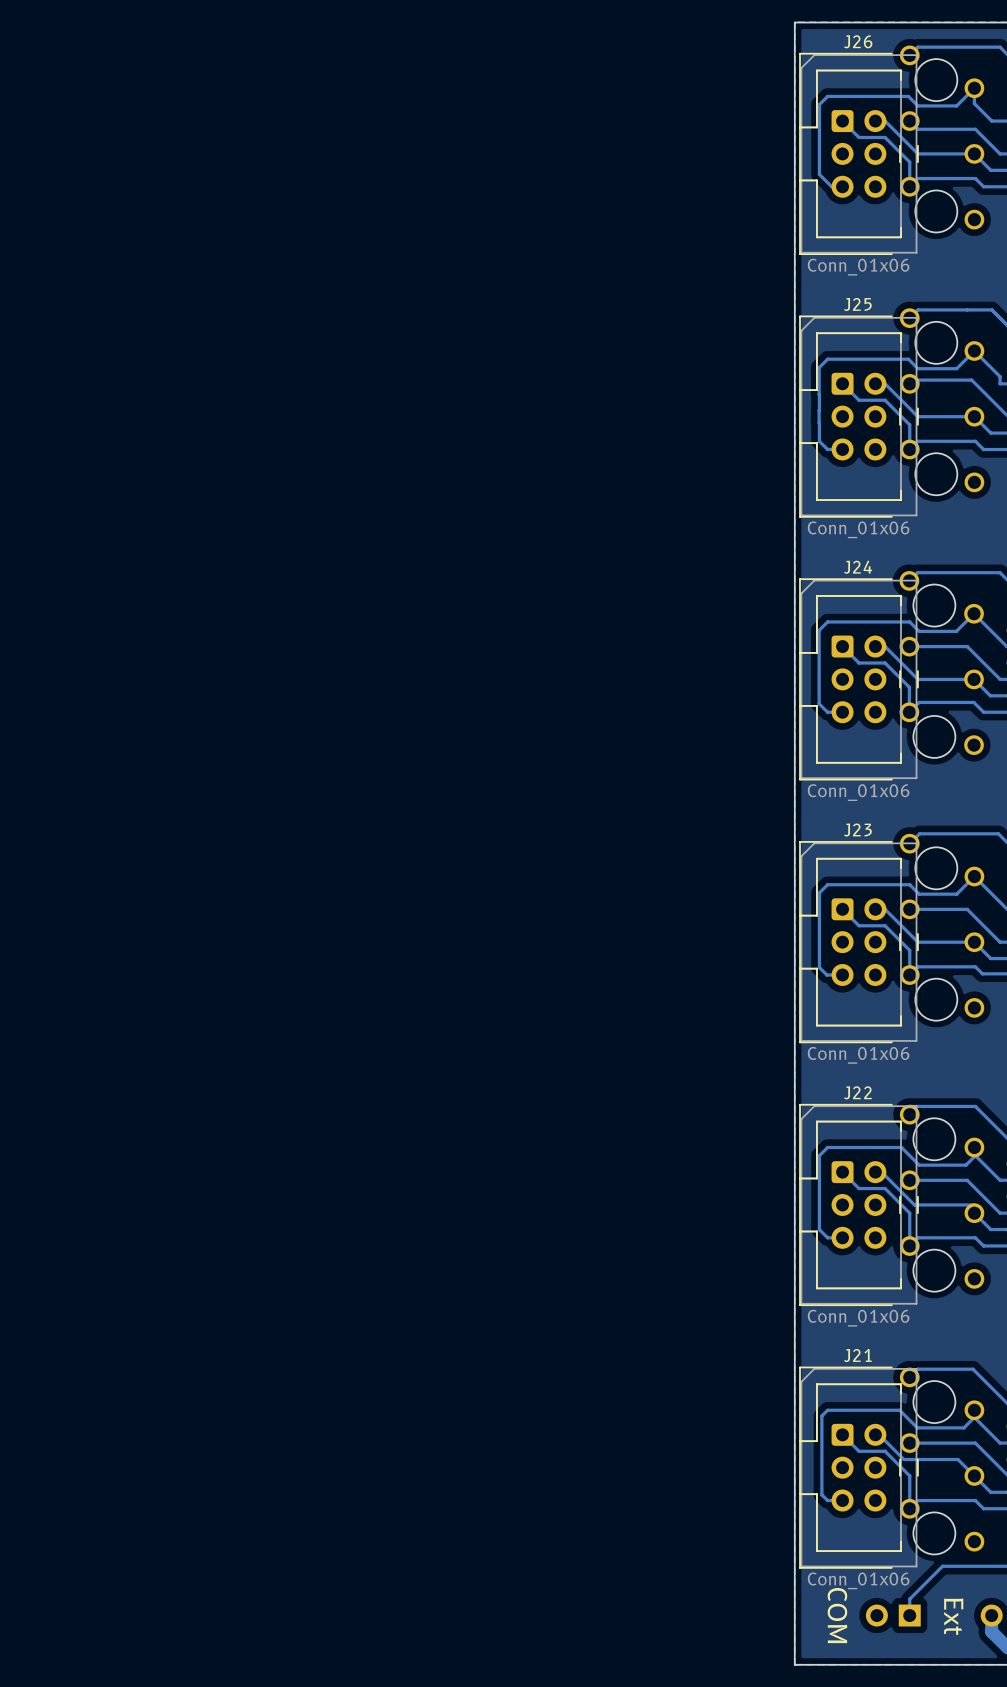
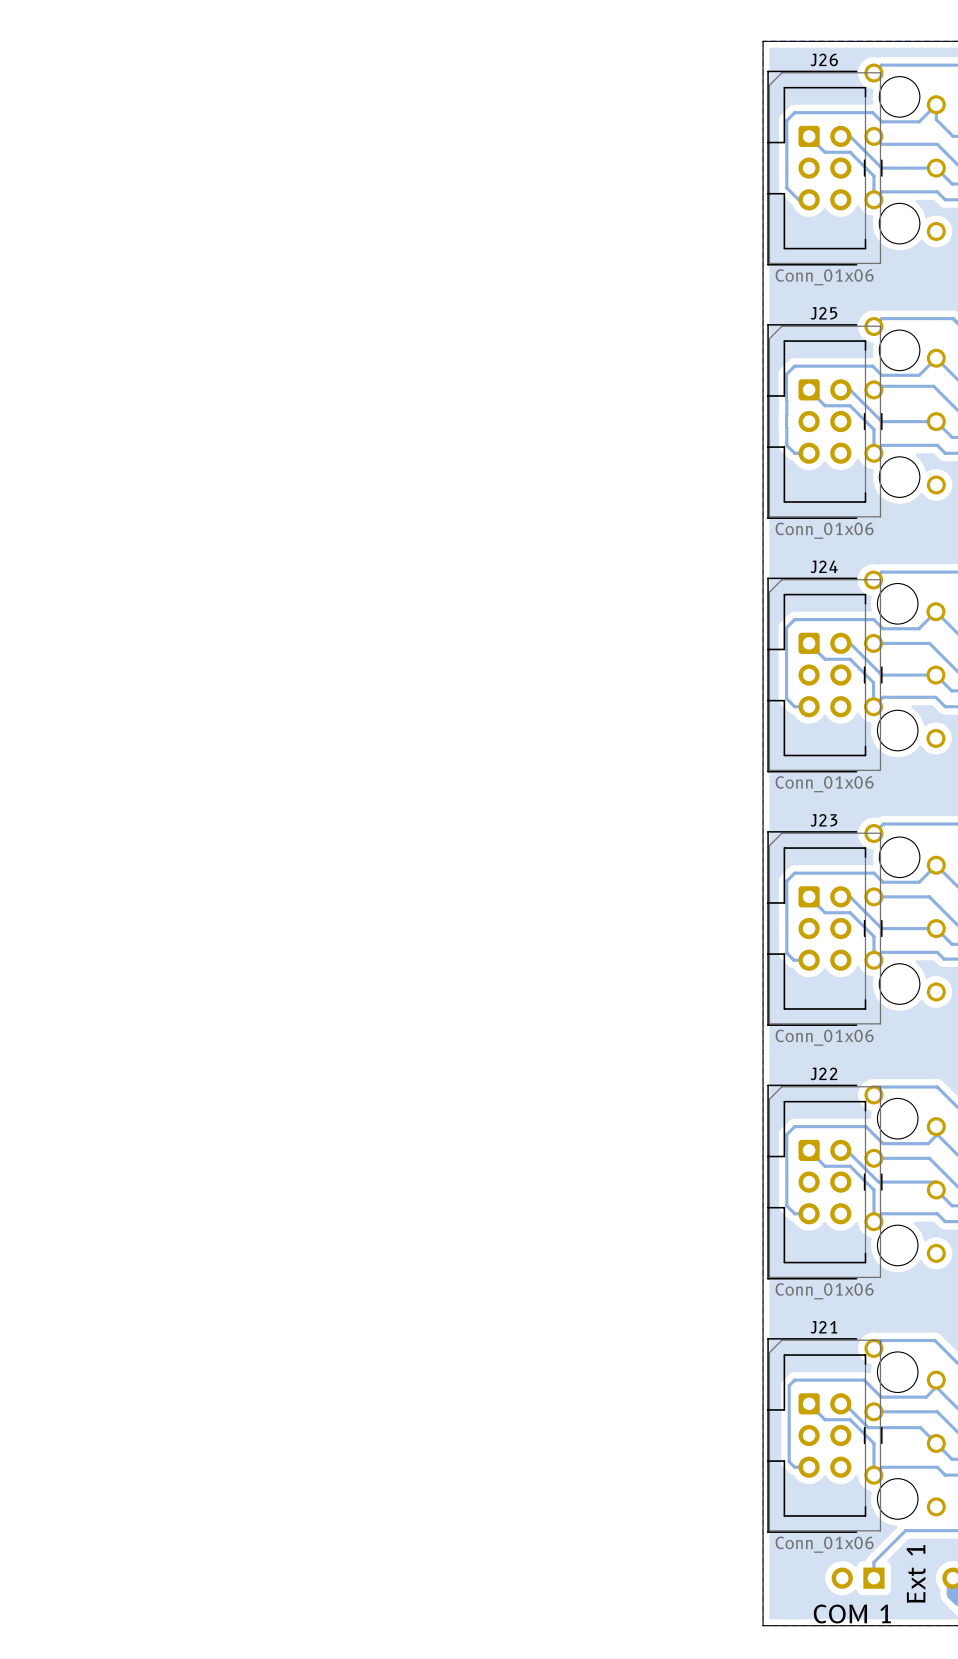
text: COM (837, 1615) -> COM 1 (852, 1614)
text: Ext (953, 1616) -> Ext 1 (916, 1573)

